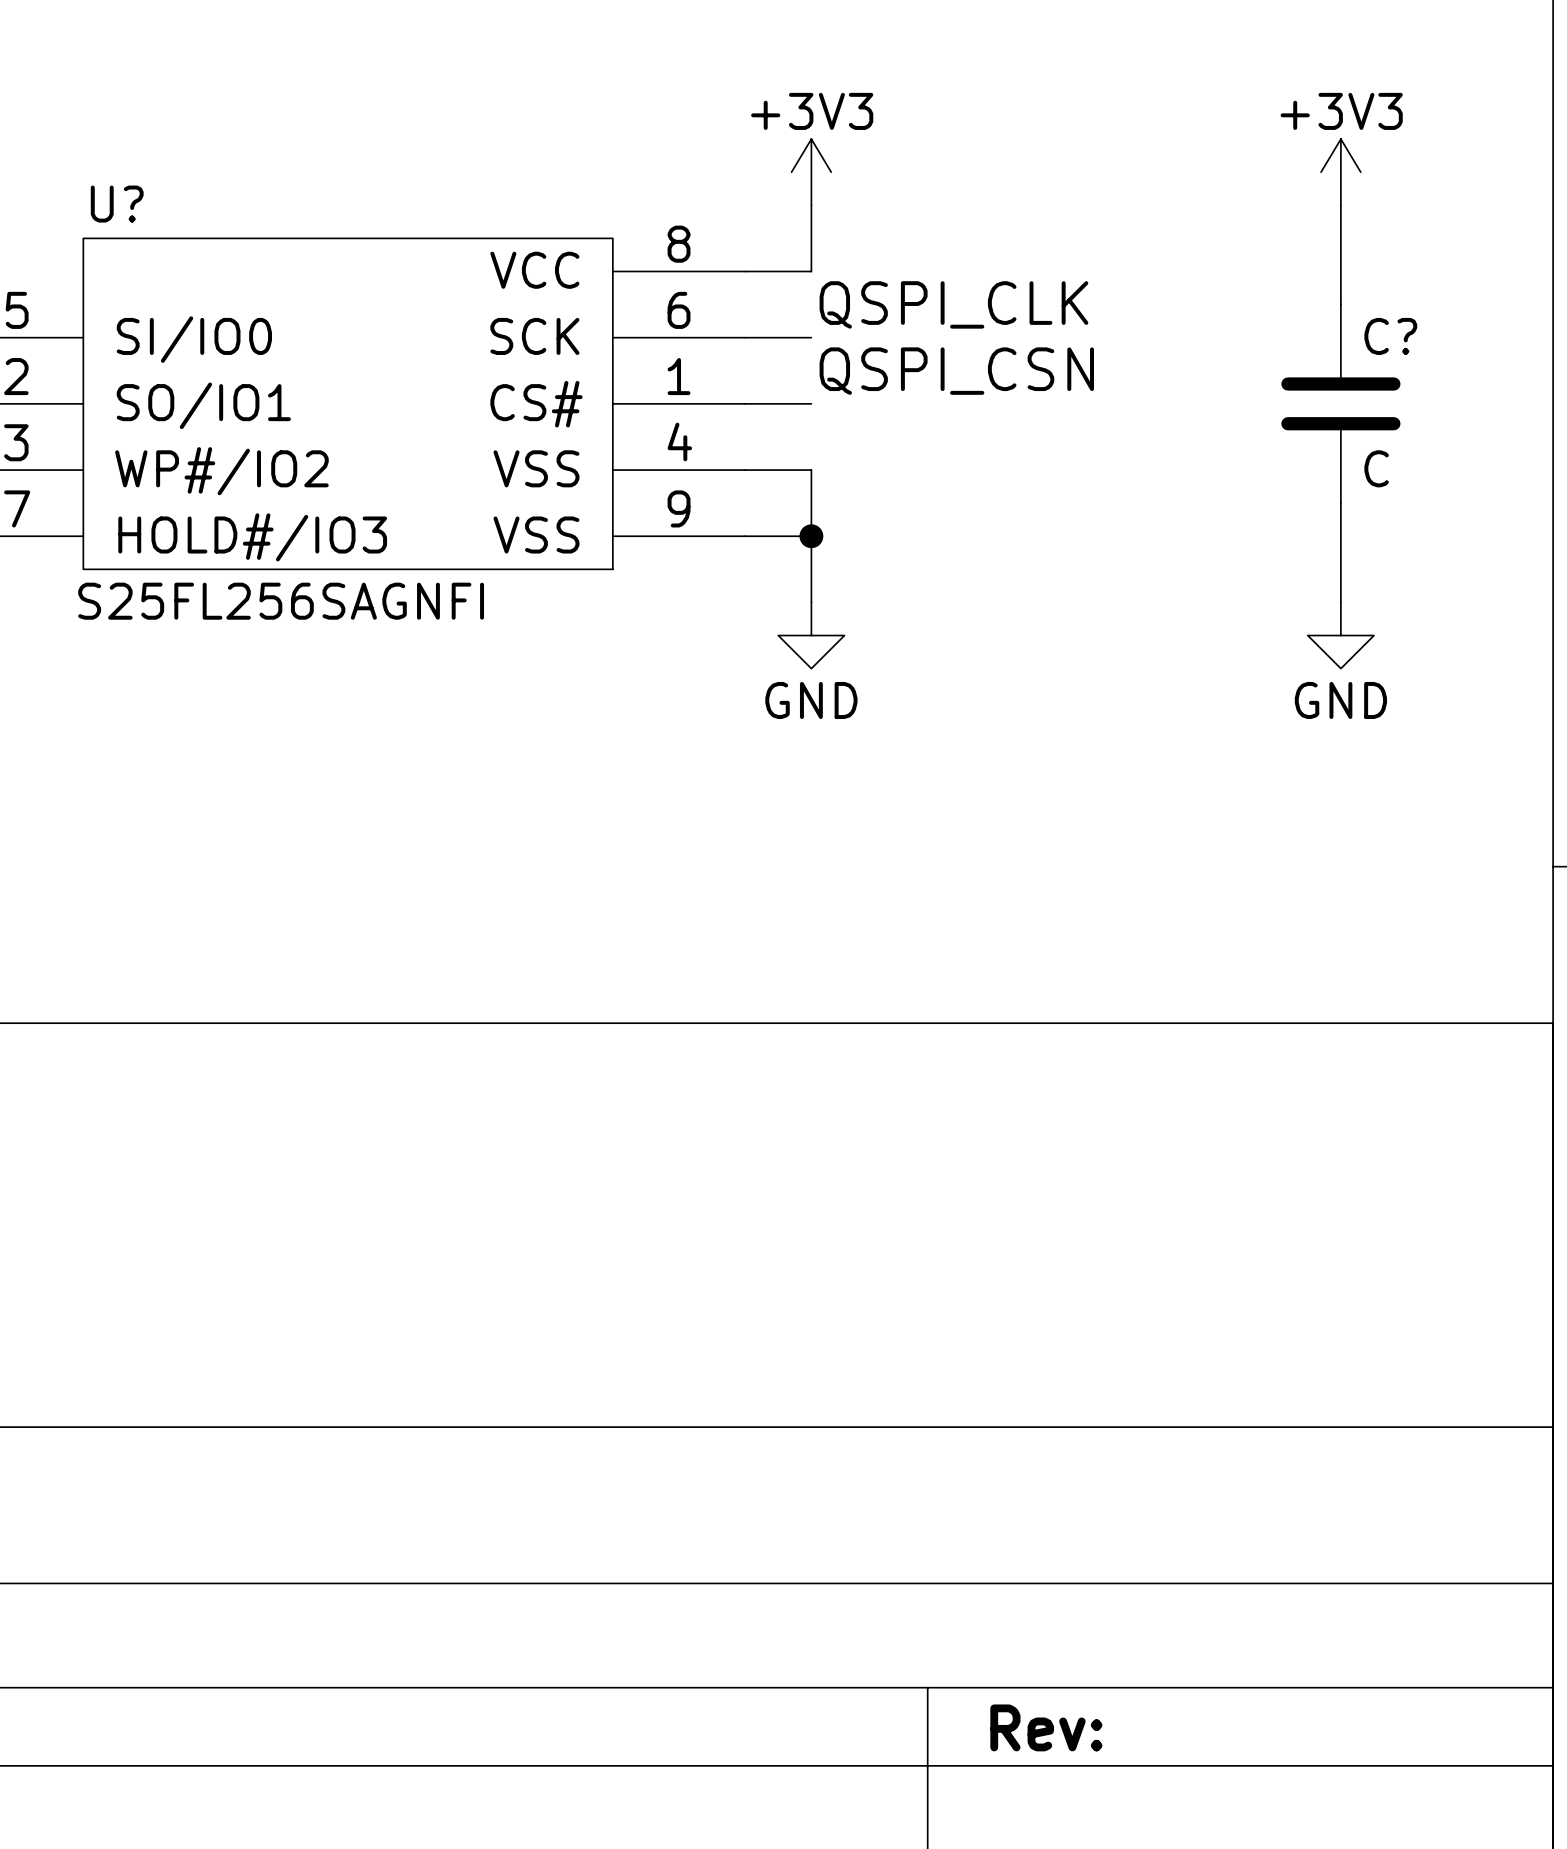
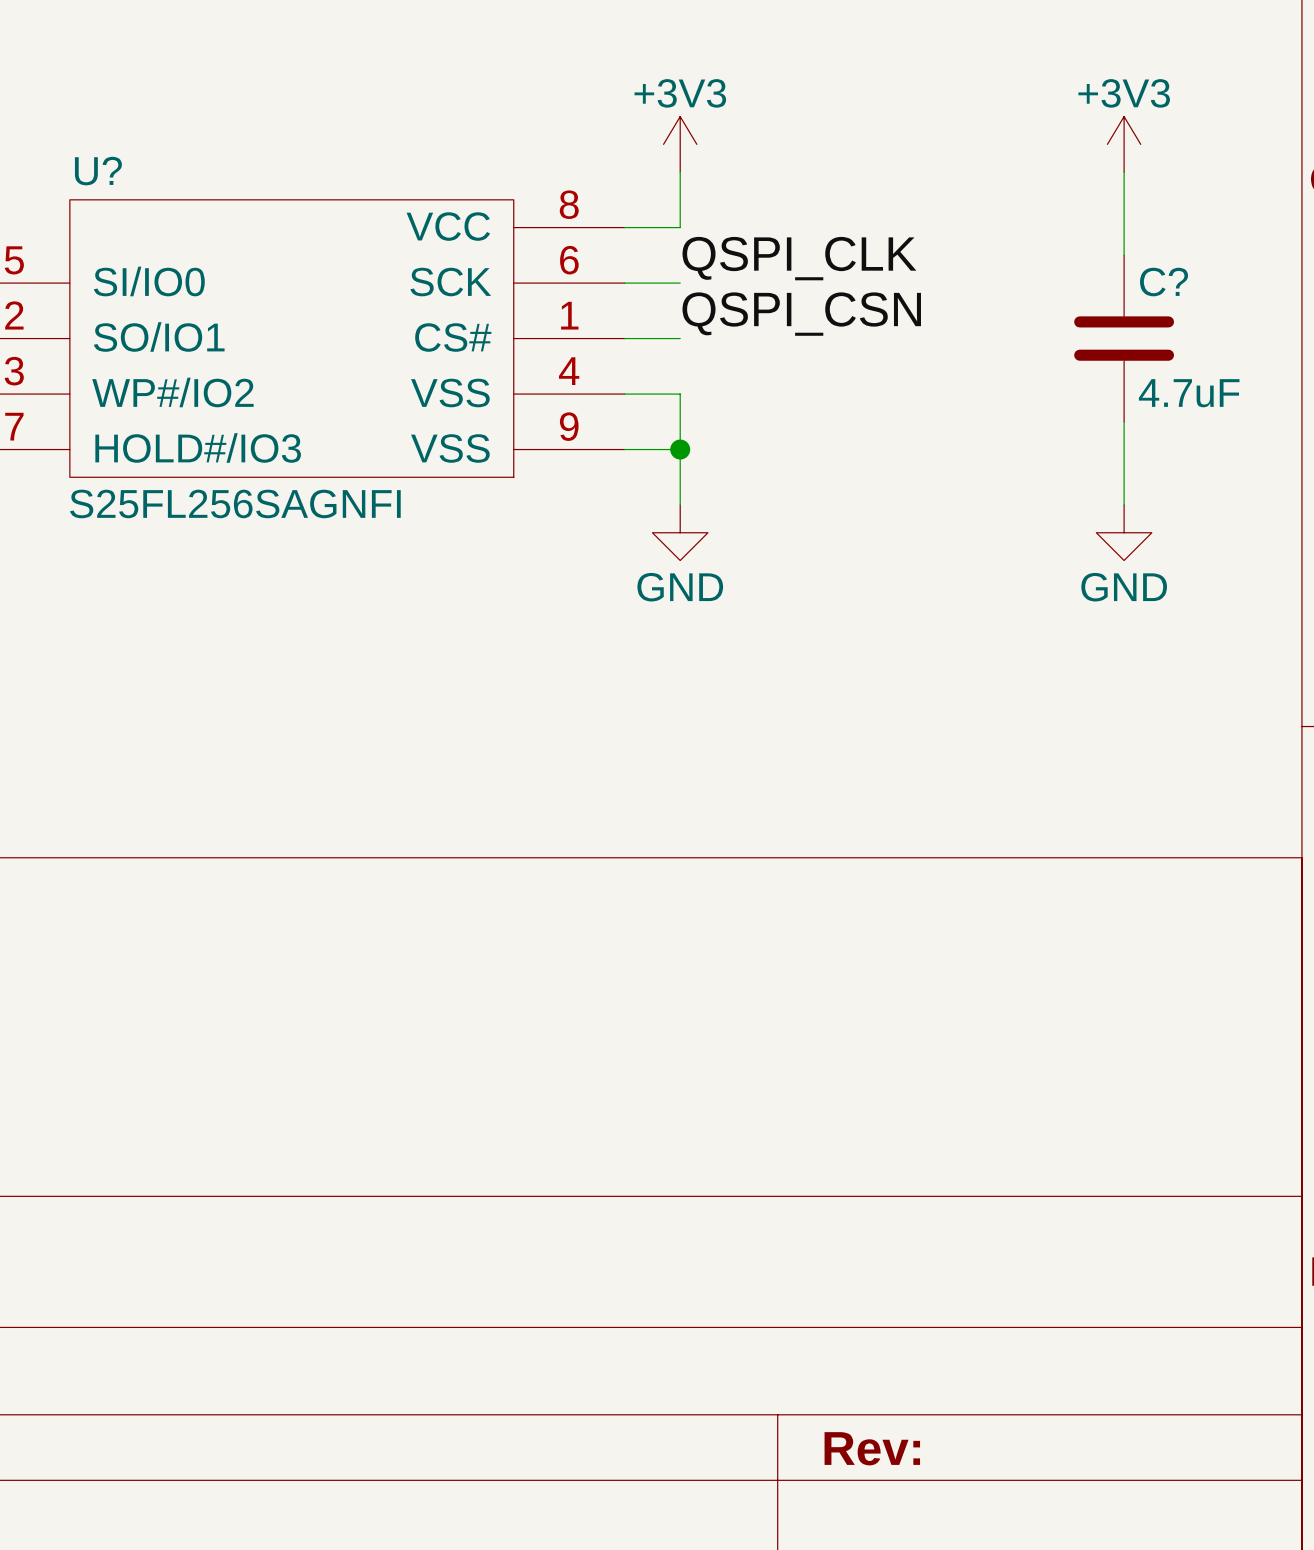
C? value: C (1376, 468) -> 4.7uF (1189, 393)

